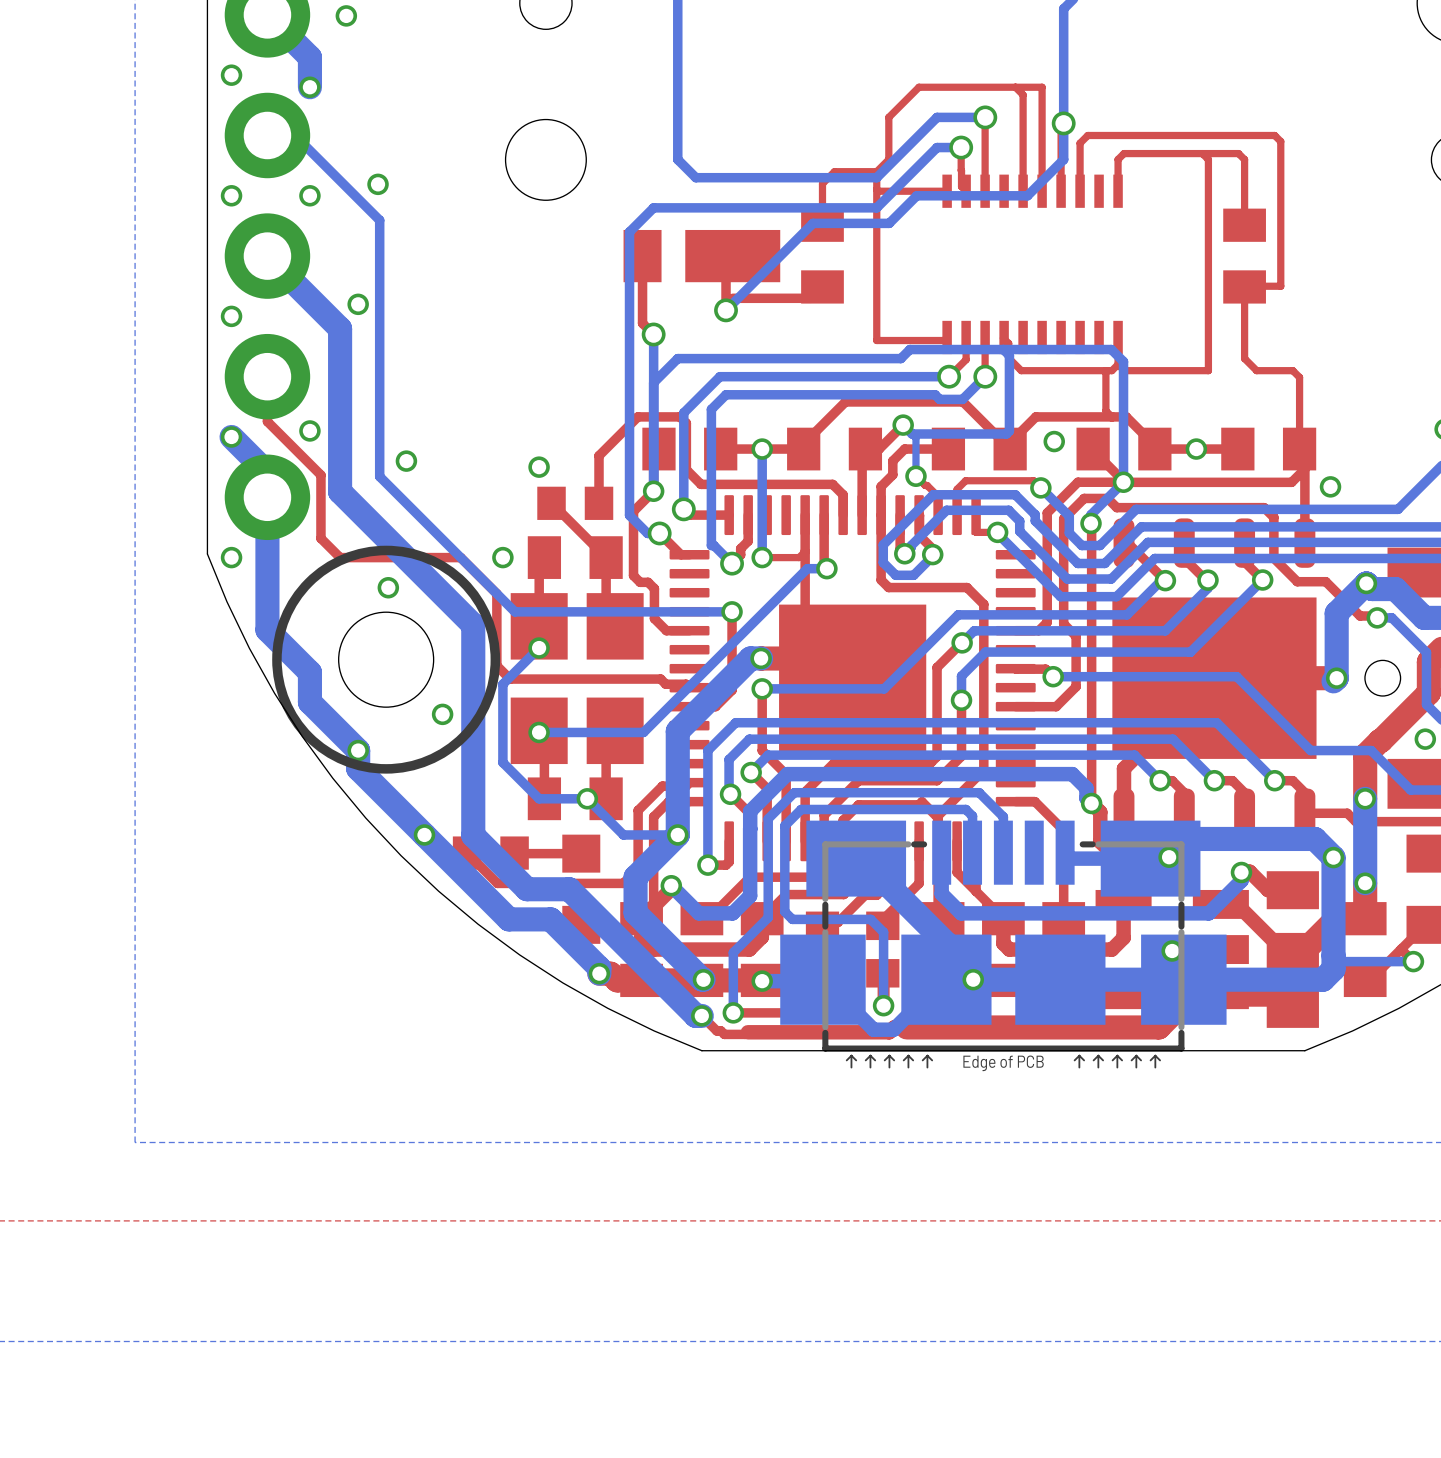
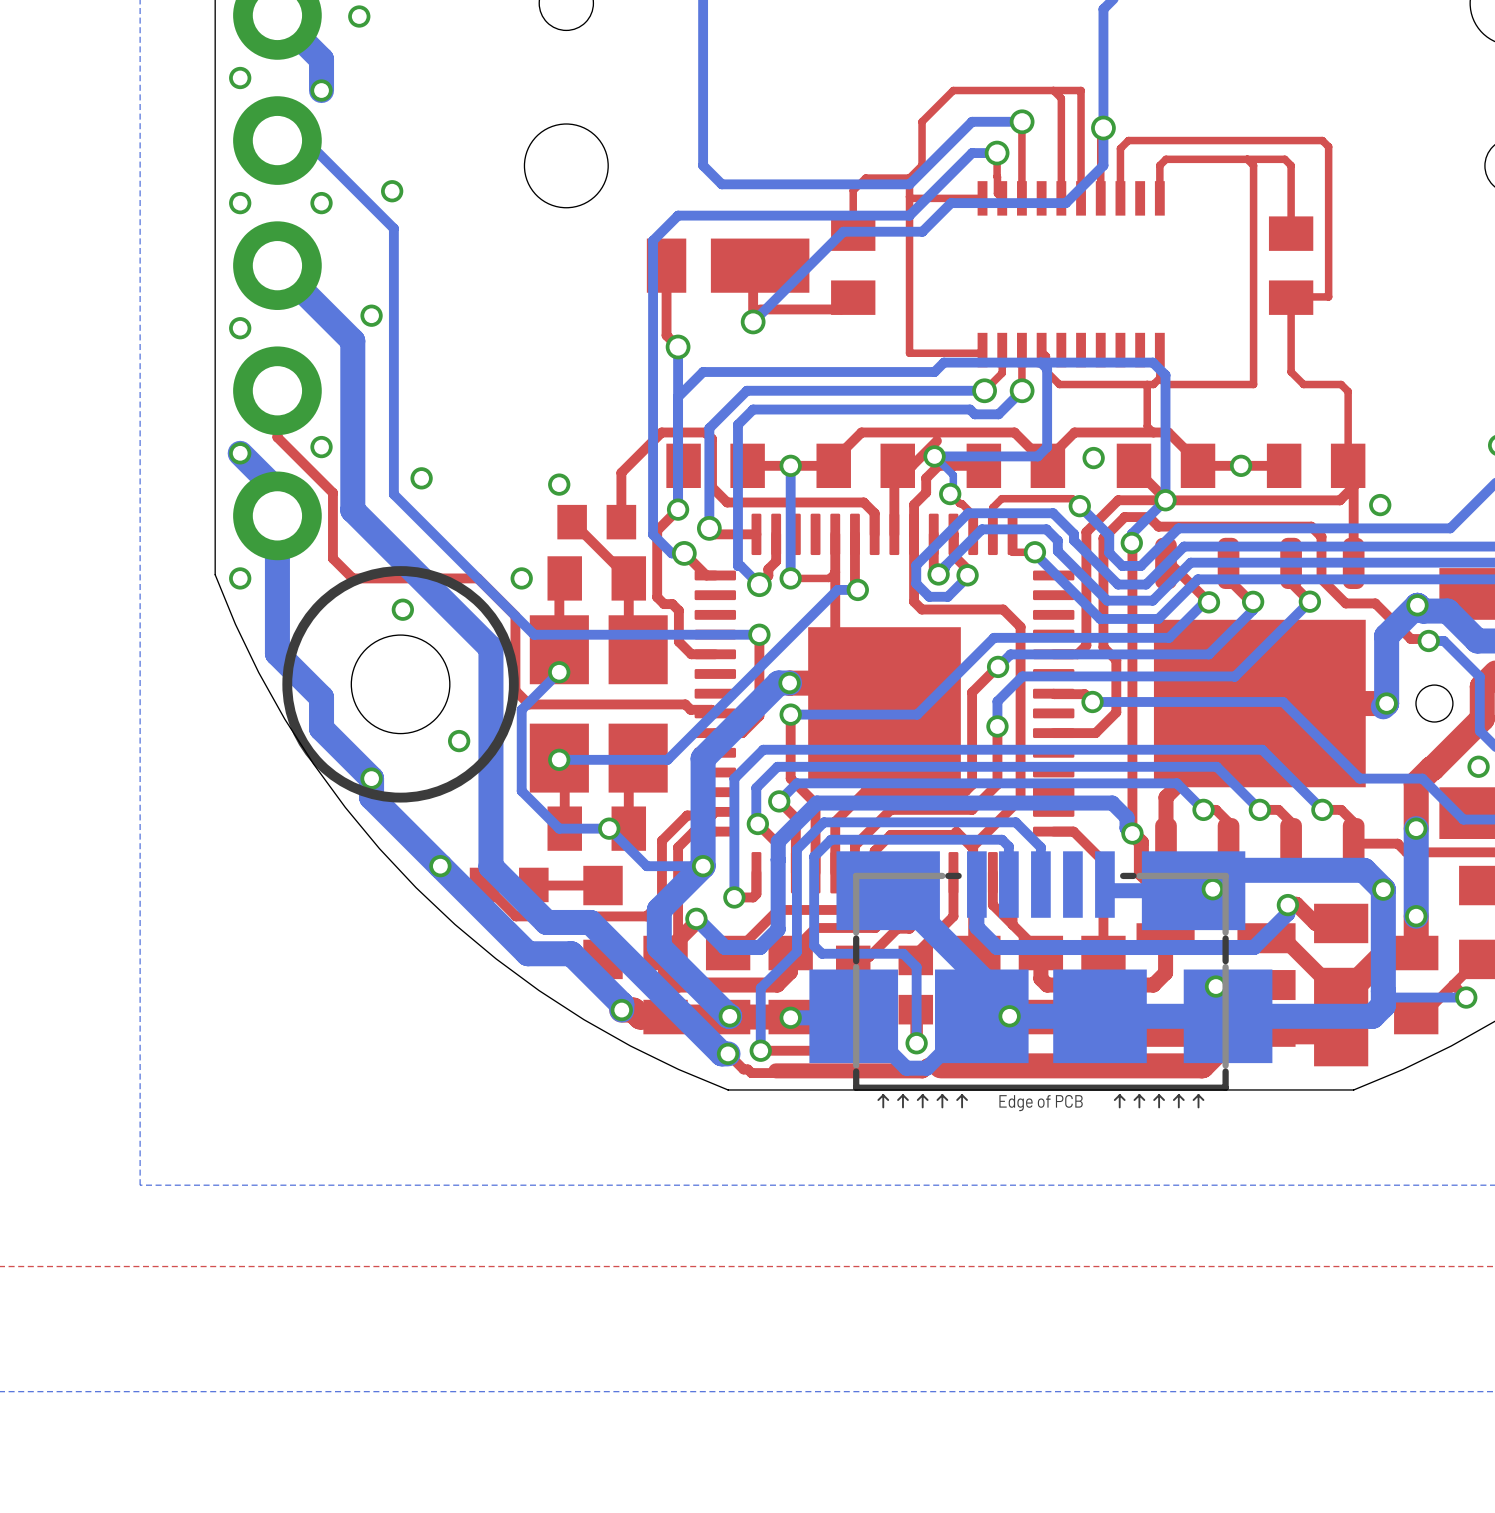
top track: (977, 416) (963, 401) (845, 401) (830, 416) -> (1014, 432) (861, 432)
via position: (903, 425) -> (934, 456)
bottom track: (1006, 434) (912, 434) (903, 425) (915, 437) (915, 476) -> (1044, 450) (1037, 456) (934, 456) (953, 475) (953, 497)

